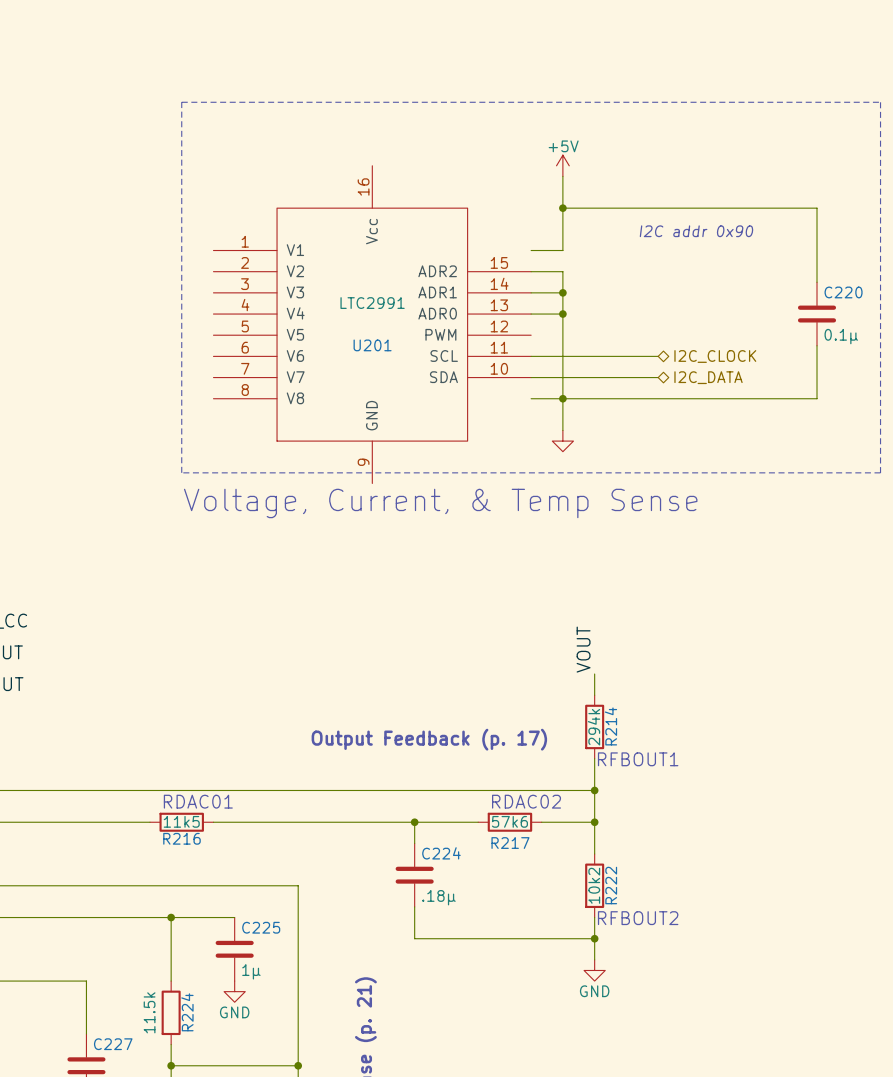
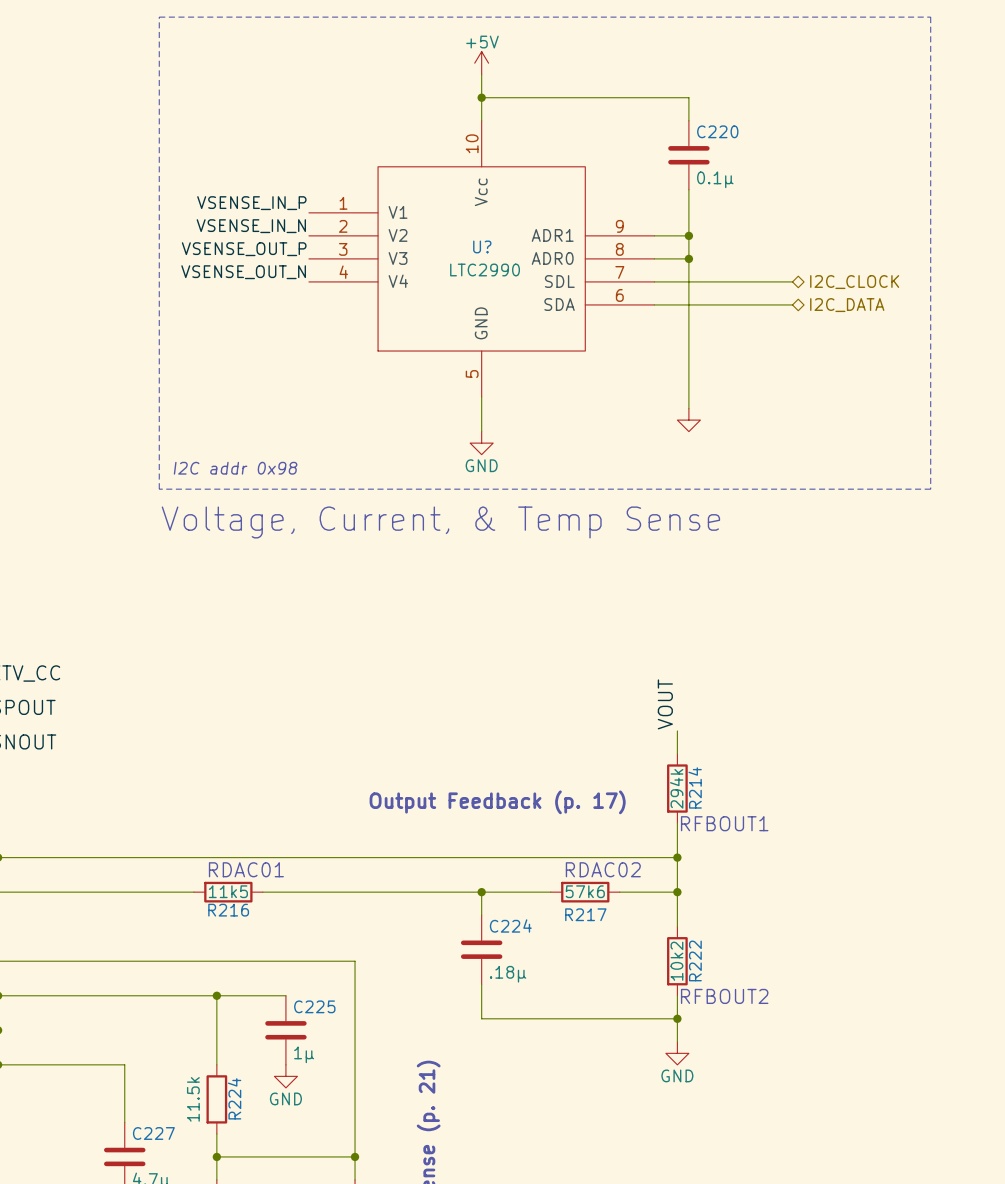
wire: none -> (481, 74) (481, 120)
wire: none -> (481, 97) (688, 97) (688, 120)
junction: none -> (481, 97)
line: (181, 102) (880, 102) (880, 472) (181, 472) (181, 102) -> (159, 17) (159, 489) (930, 489) (930, 17) (159, 17)
power symbol position: +5V (562, 165) -> +5V (481, 63)
wire: (562, 176) (562, 250) (531, 250) -> none
wire: none -> (688, 189) (688, 408)
label: none -> VSENSE_IN_P (251, 203)
wire: (562, 208) (817, 208) (817, 282) -> none
junction: (562, 208) -> none
label: none -> VSENSE_IN_N (251, 226)
junction: none -> (688, 235)
label: none -> VSENSE_OUT_P (244, 249)
text: I2C addr 0x90 (696, 231) -> none
U?: none -> LTC2990 (481, 258)
junction: none -> (688, 258)
label: none -> VSENSE_OUT_N (243, 272)
wire: (531, 271) (562, 271) (562, 430) -> none
wire: (531, 292) (562, 292) -> (654, 235) (688, 235)
junction: (562, 292) -> none
wire: (531, 314) (562, 314) -> (654, 258) (688, 258)
junction: (562, 314) -> none
C220 position: (817, 314) -> (688, 155)
U201: LTC2991 (372, 324) -> none
wire: (817, 345) (817, 398) (531, 398) -> none
wire: (531, 356) (658, 356) -> (654, 304) (792, 304)
hierarchical label position: I2C_CLOCK (715, 356) -> I2C_CLOCK (854, 282)
wire: none -> (481, 397) (481, 431)
wire: (531, 377) (658, 377) -> (654, 281) (792, 281)
hierarchical label position: I2C_DATA (708, 377) -> I2C_DATA (847, 305)
junction: (562, 398) -> none
power symbol: none -> GND (481, 443)
text: none -> I2C addr 0x98 (235, 468)
power symbol position: (562, 441) -> (688, 420)
text position: Voltage, Current, & Temp Sense (440, 503) -> Voltage, Current, & Temp Sense (440, 522)

